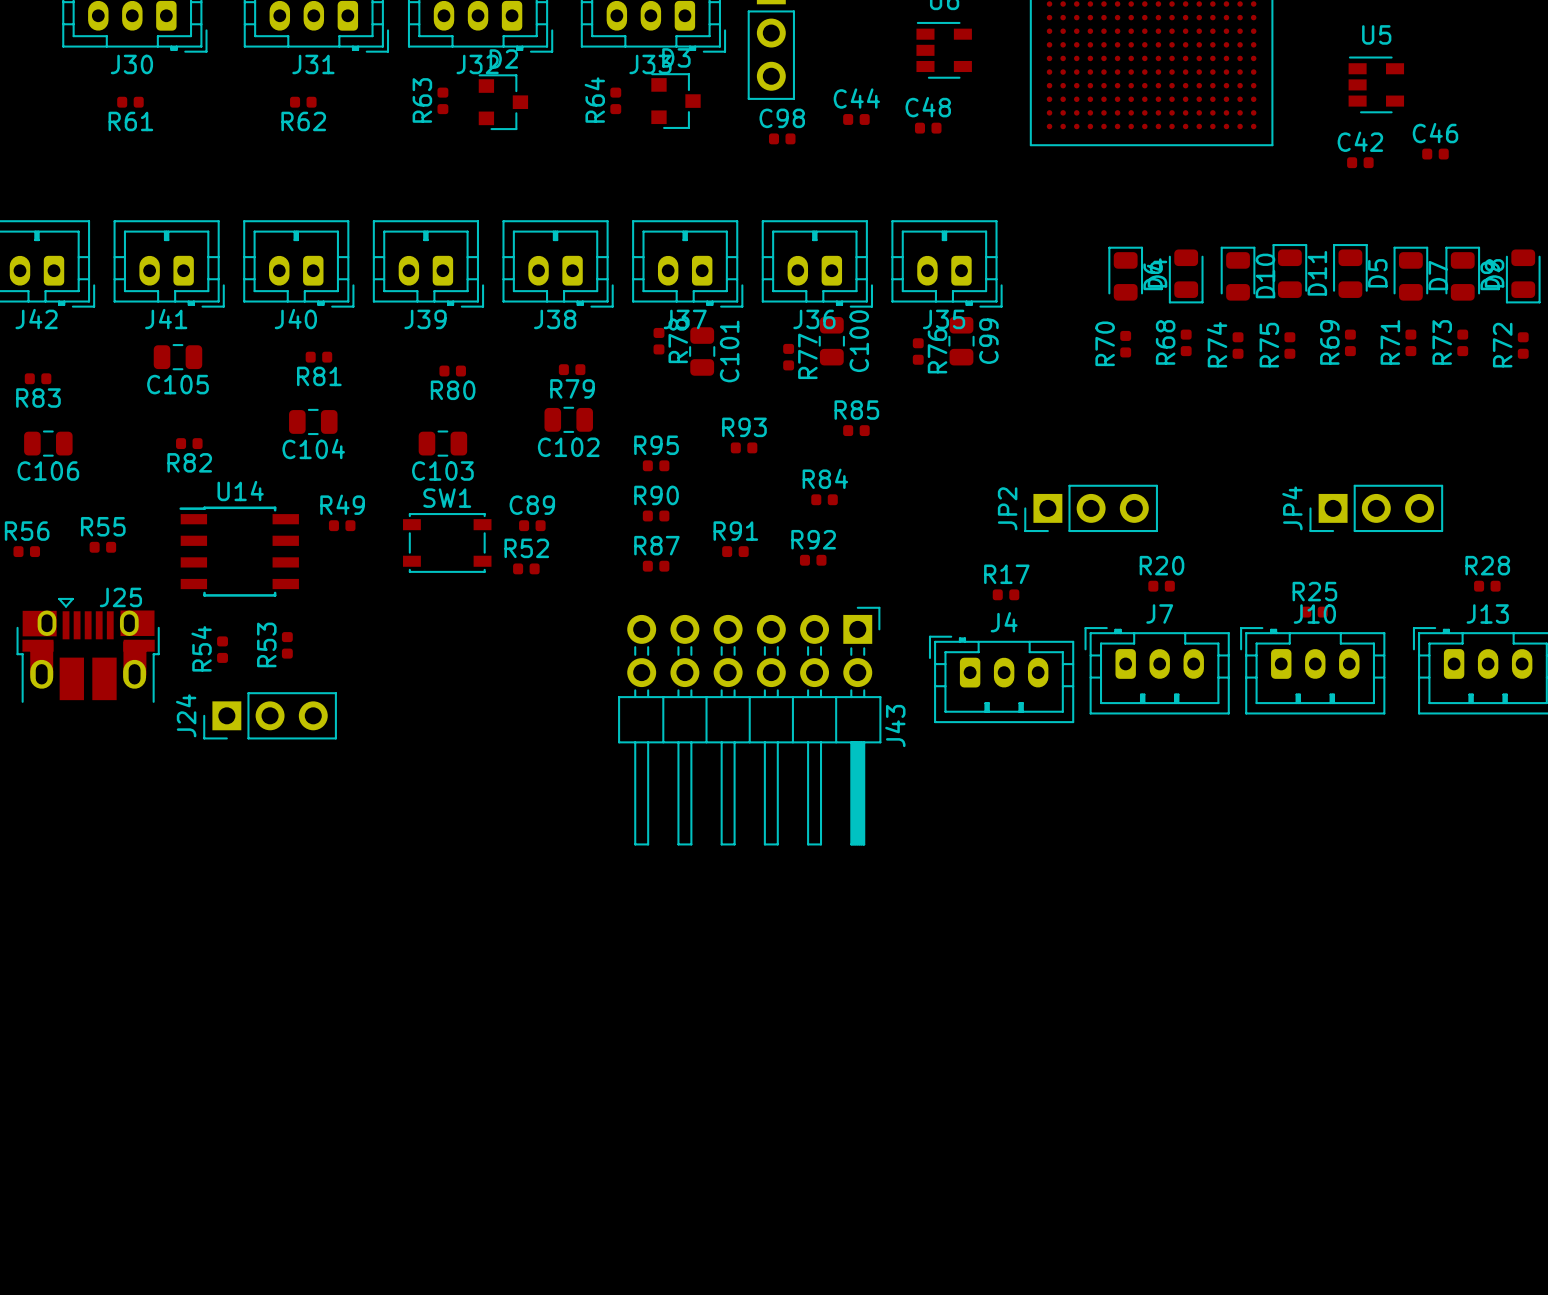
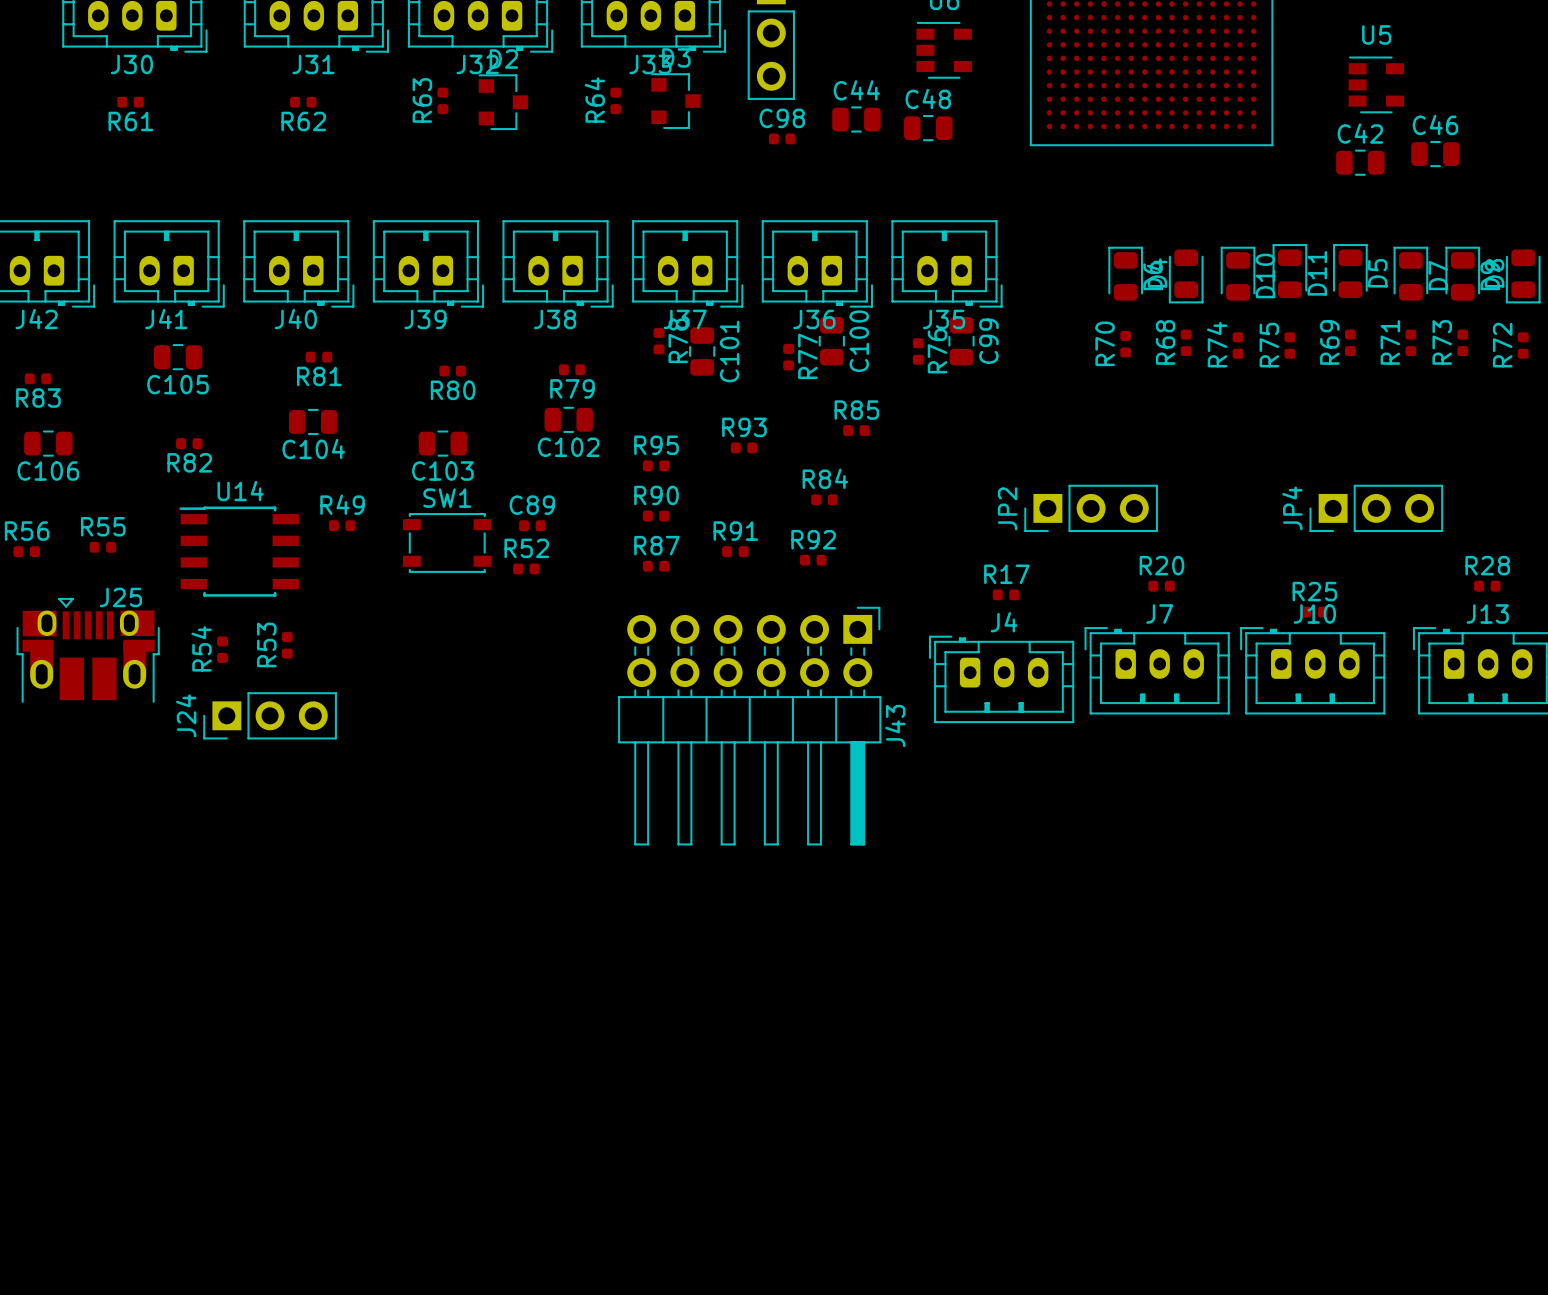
C44 footprint: [843, 114, 870, 125] -> [832, 106, 881, 133]
C48 footprint: [914, 122, 942, 134] -> [903, 115, 953, 142]
C46 footprint: [1422, 148, 1449, 160] -> [1411, 140, 1460, 168]
C42 footprint: [1347, 157, 1374, 169] -> [1336, 149, 1385, 176]

